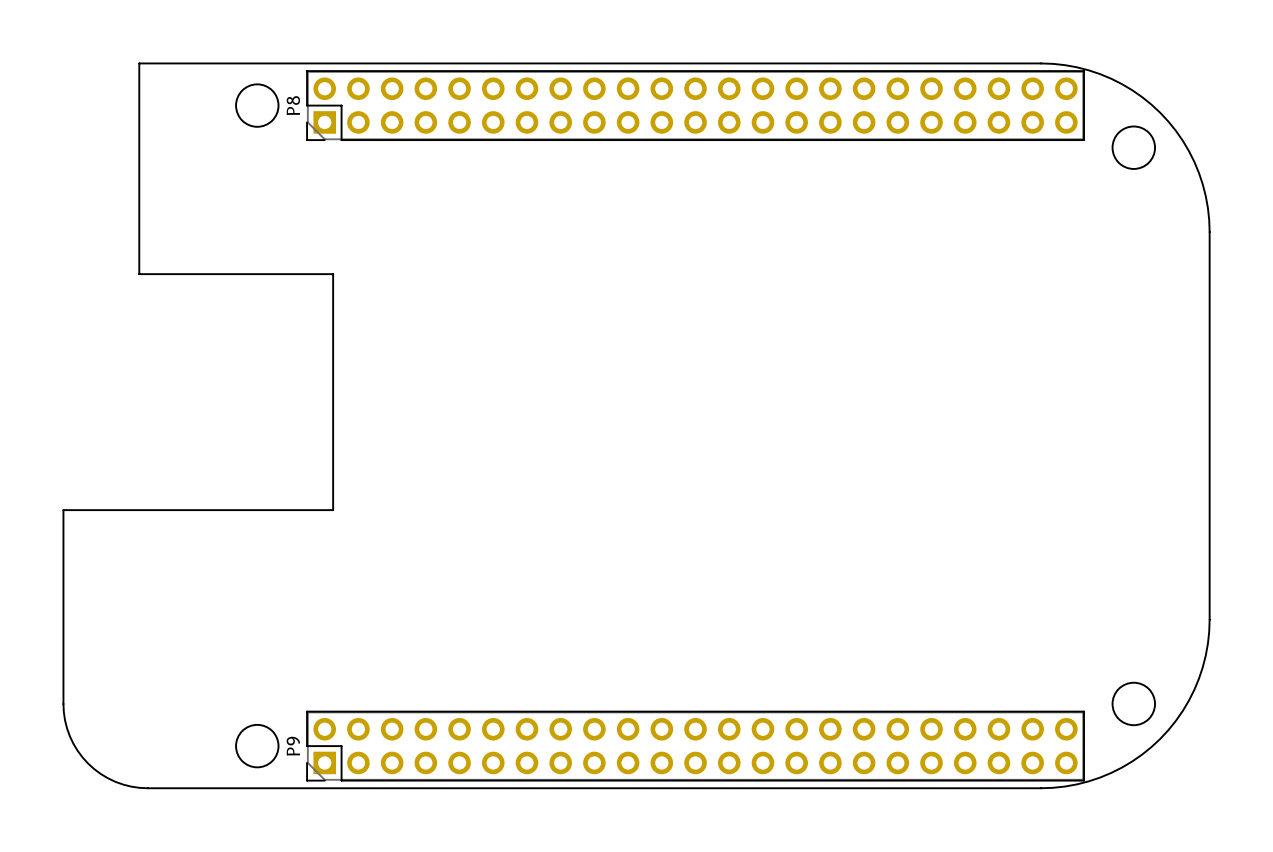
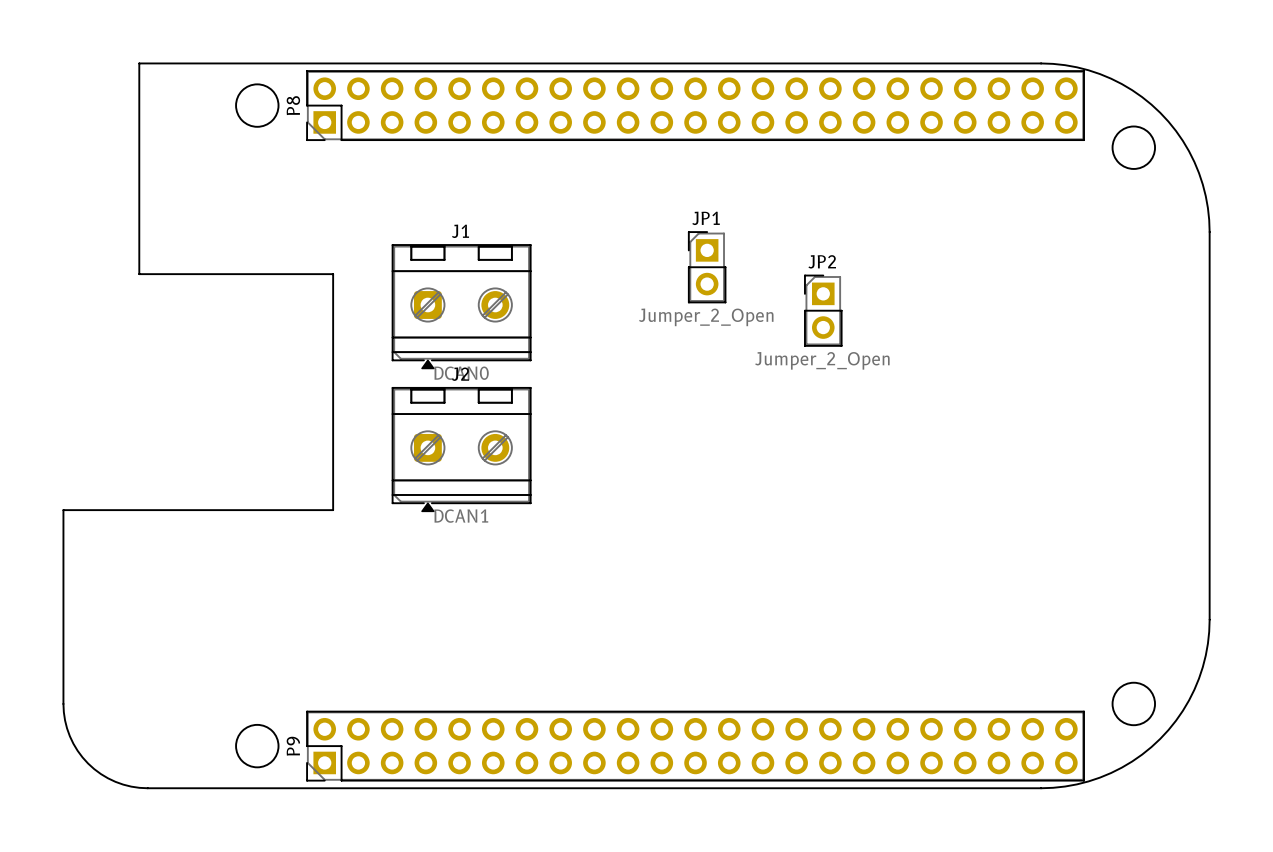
JP1: none -> Jumper_2_Open (707, 267)
J1: none -> DCAN0 (461, 306)
JP2: none -> Jumper_2_Open (823, 310)
J2: none -> DCAN1 (461, 449)

